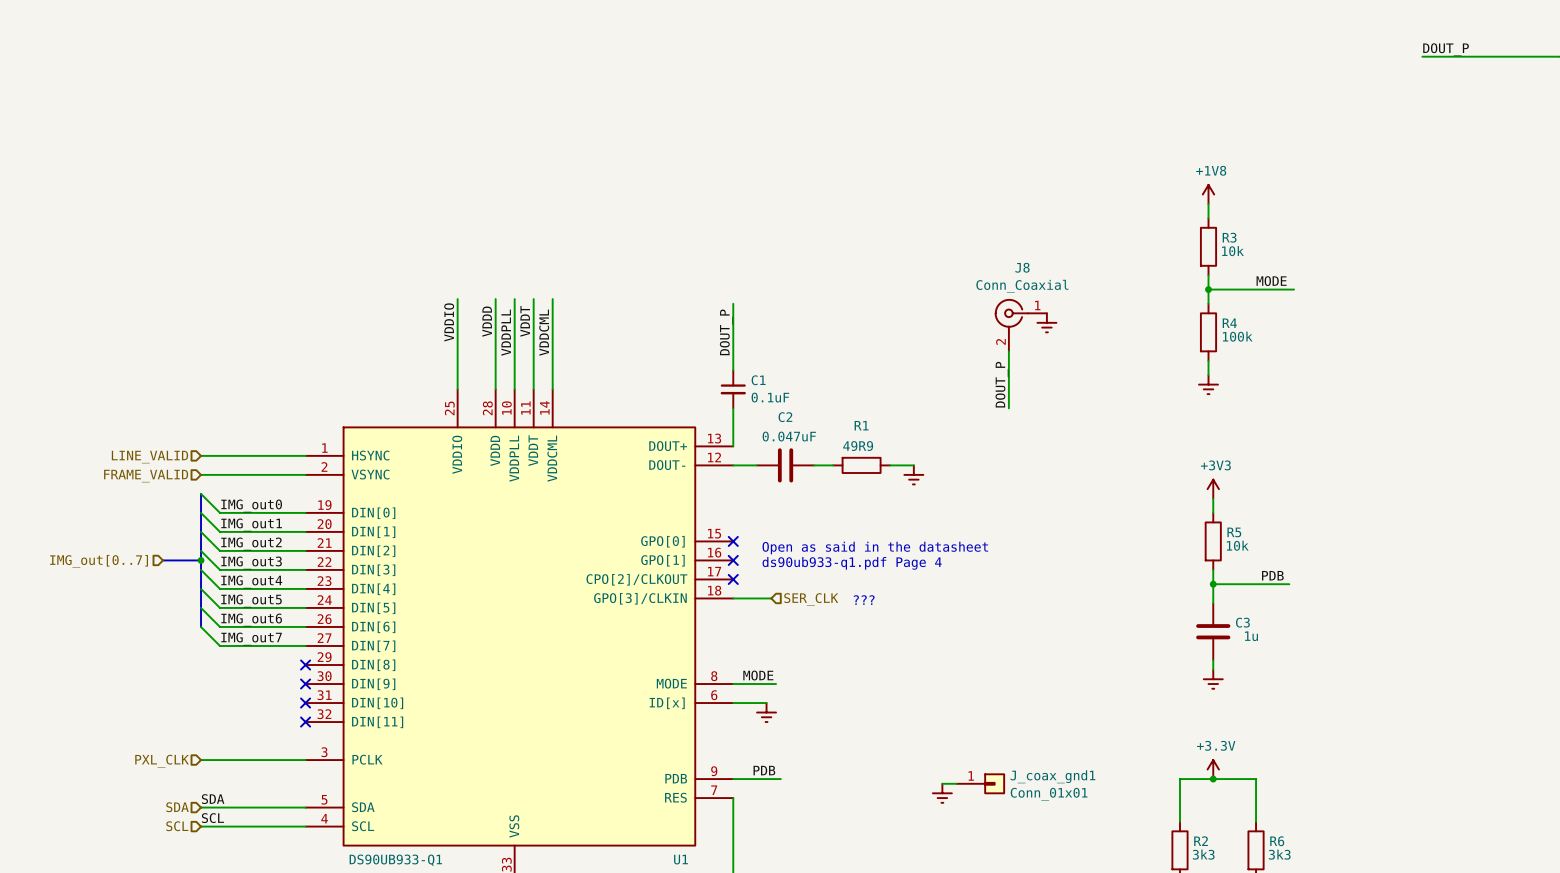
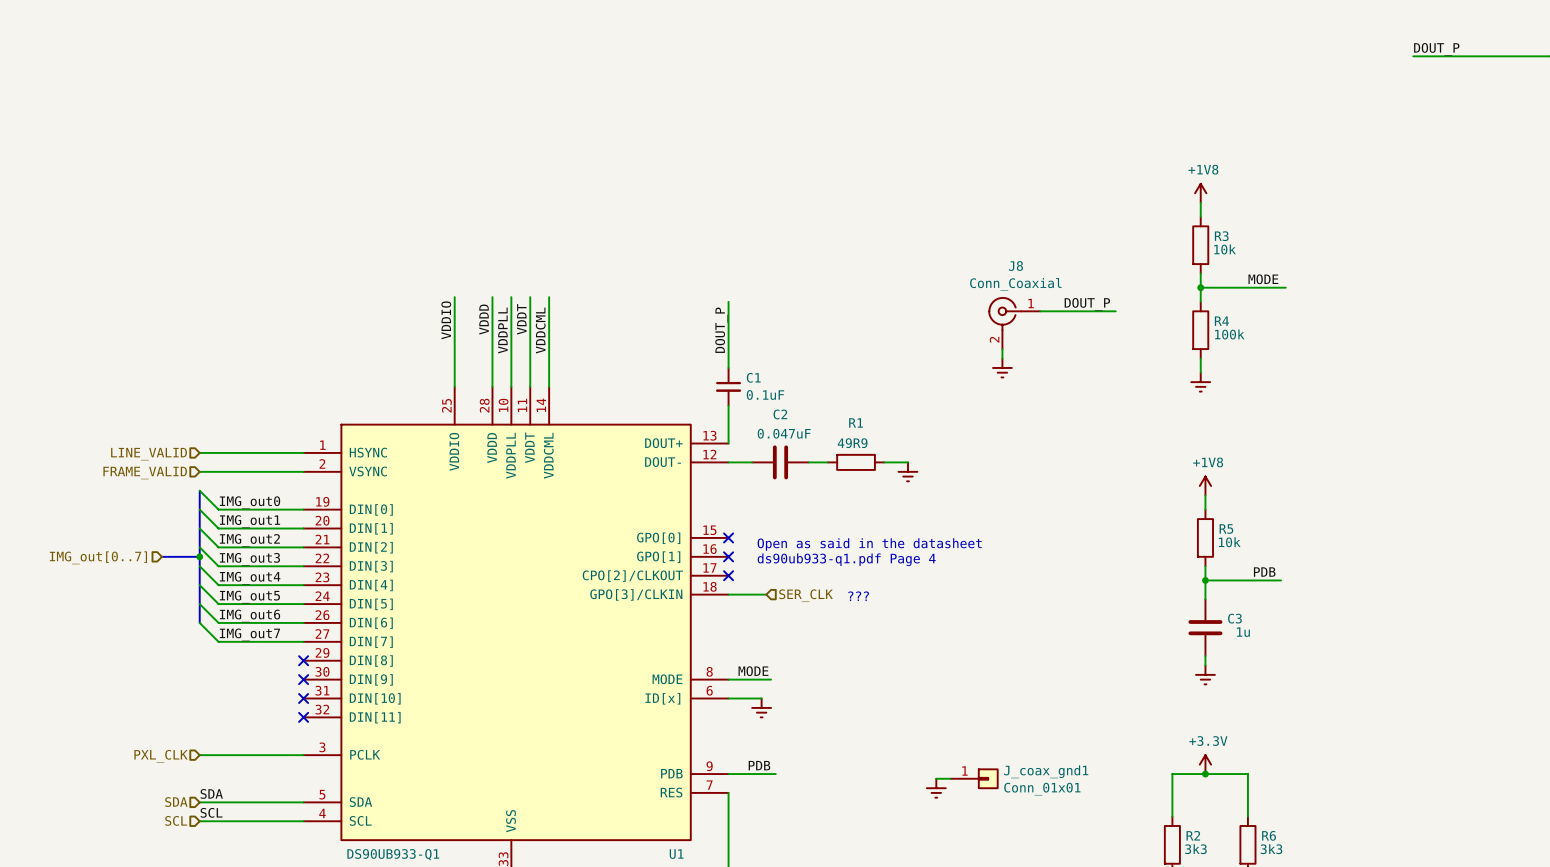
wire: none -> (1040, 311) (1115, 311)
power symbol position: (1046, 322) -> (1002, 367)
wire: (1008, 360) (1008, 408) -> none
label rotation: 0° (1001, 384) -> 90° clockwise (1087, 304)
label position: DOUT_P (1001, 384) -> DOUT_P (1087, 304)
power symbol: +3V3 (1213, 489) -> +1V8 (1205, 486)

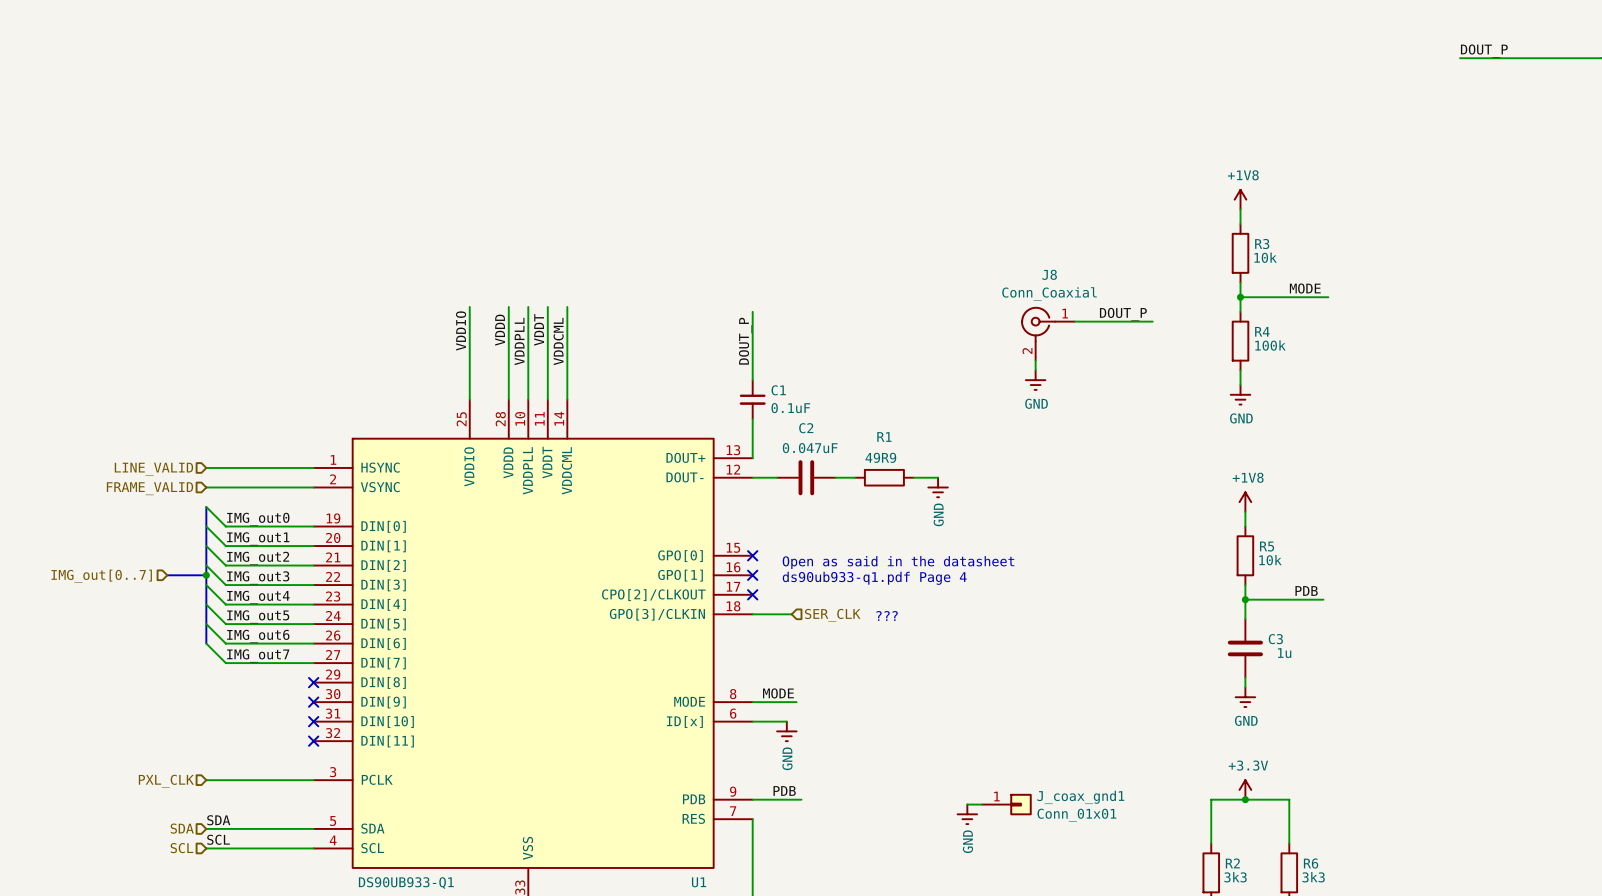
power symbol text: none -> GND (1036, 403)
power symbol text: none -> GND (1241, 418)
power symbol text: none -> GND (938, 514)
power symbol text: none -> GND (1246, 720)
power symbol text: none -> GND (787, 758)
power symbol text: none -> GND (967, 841)

